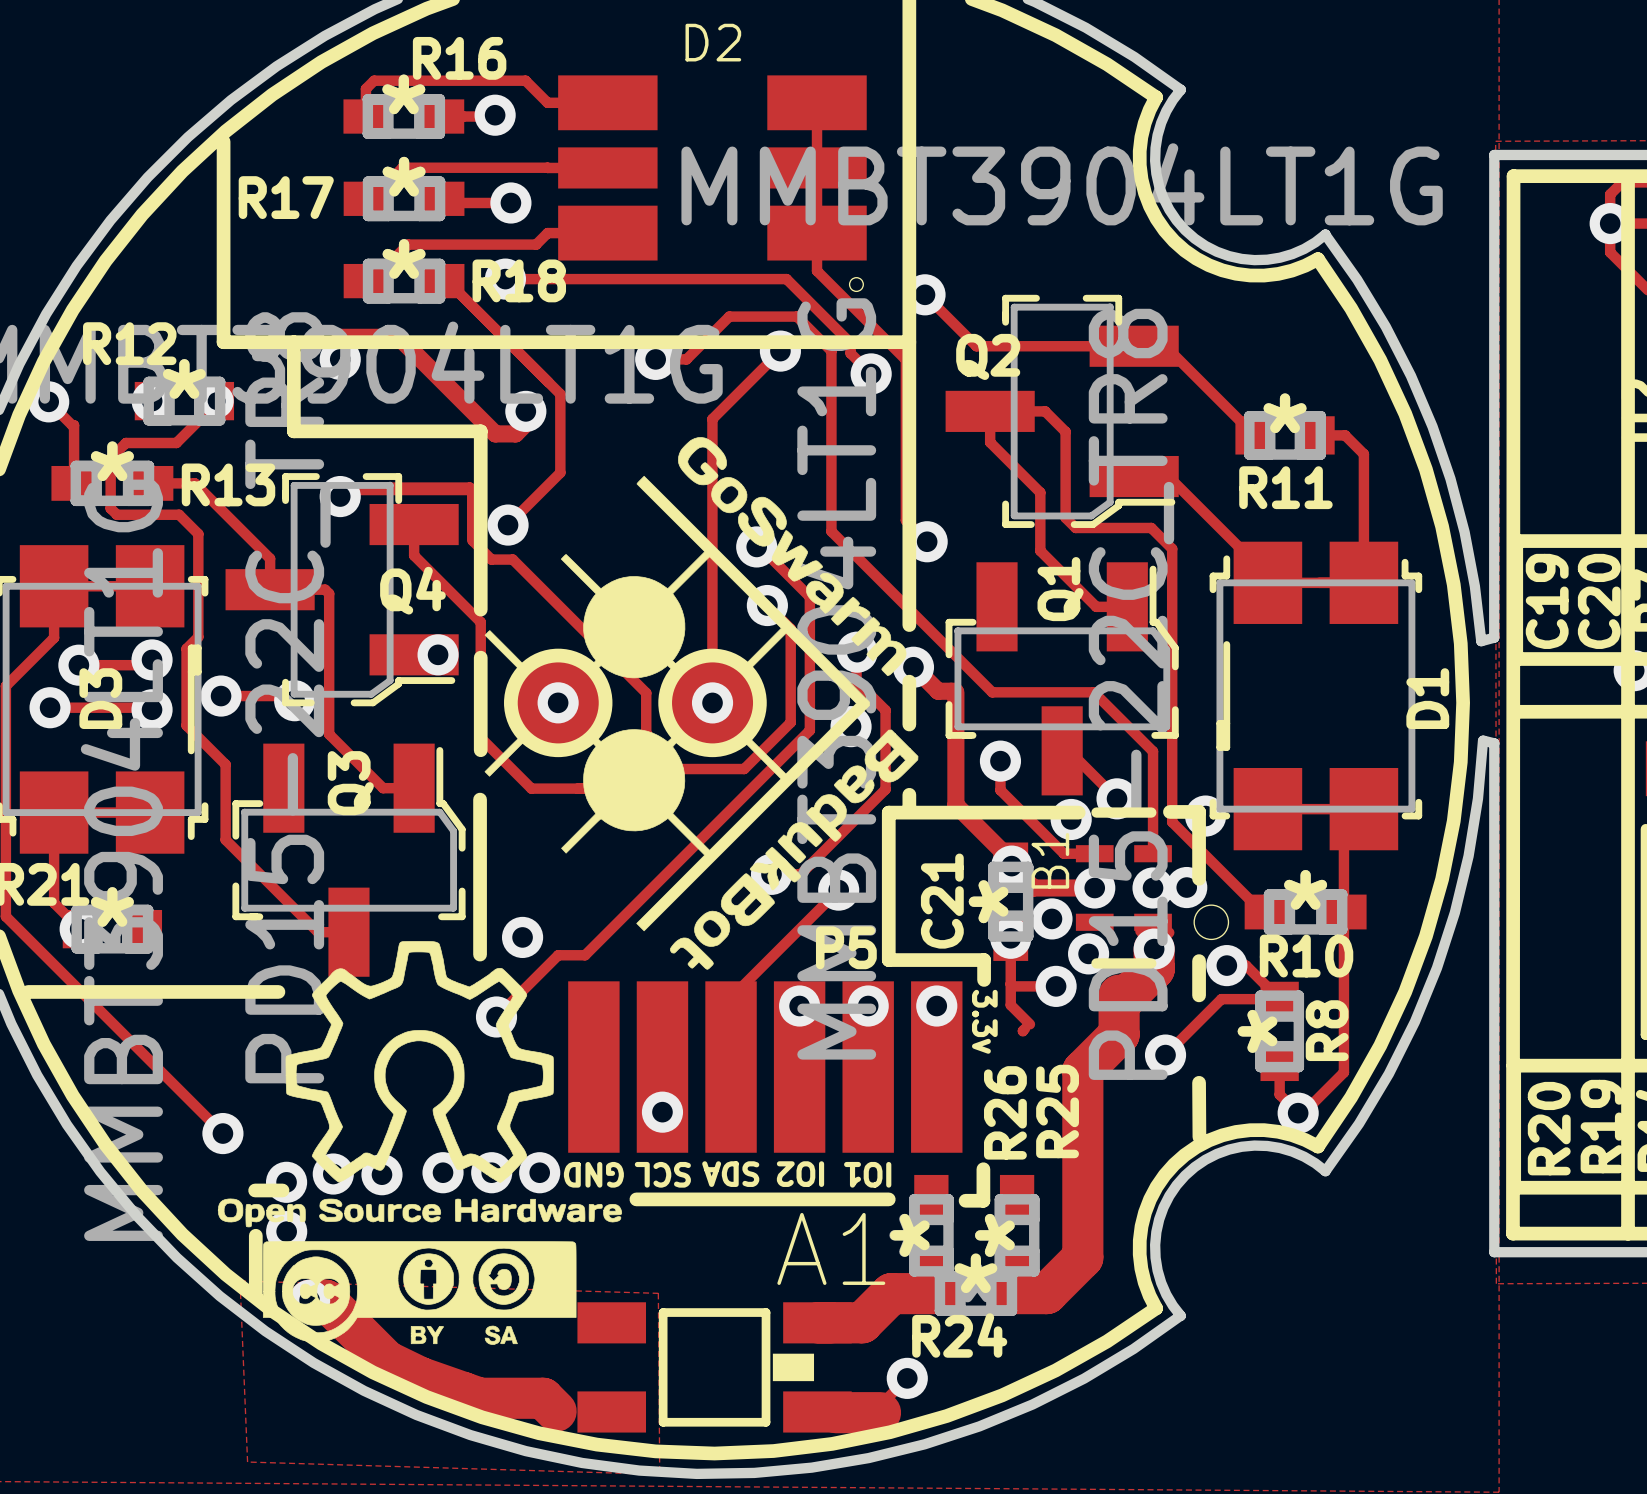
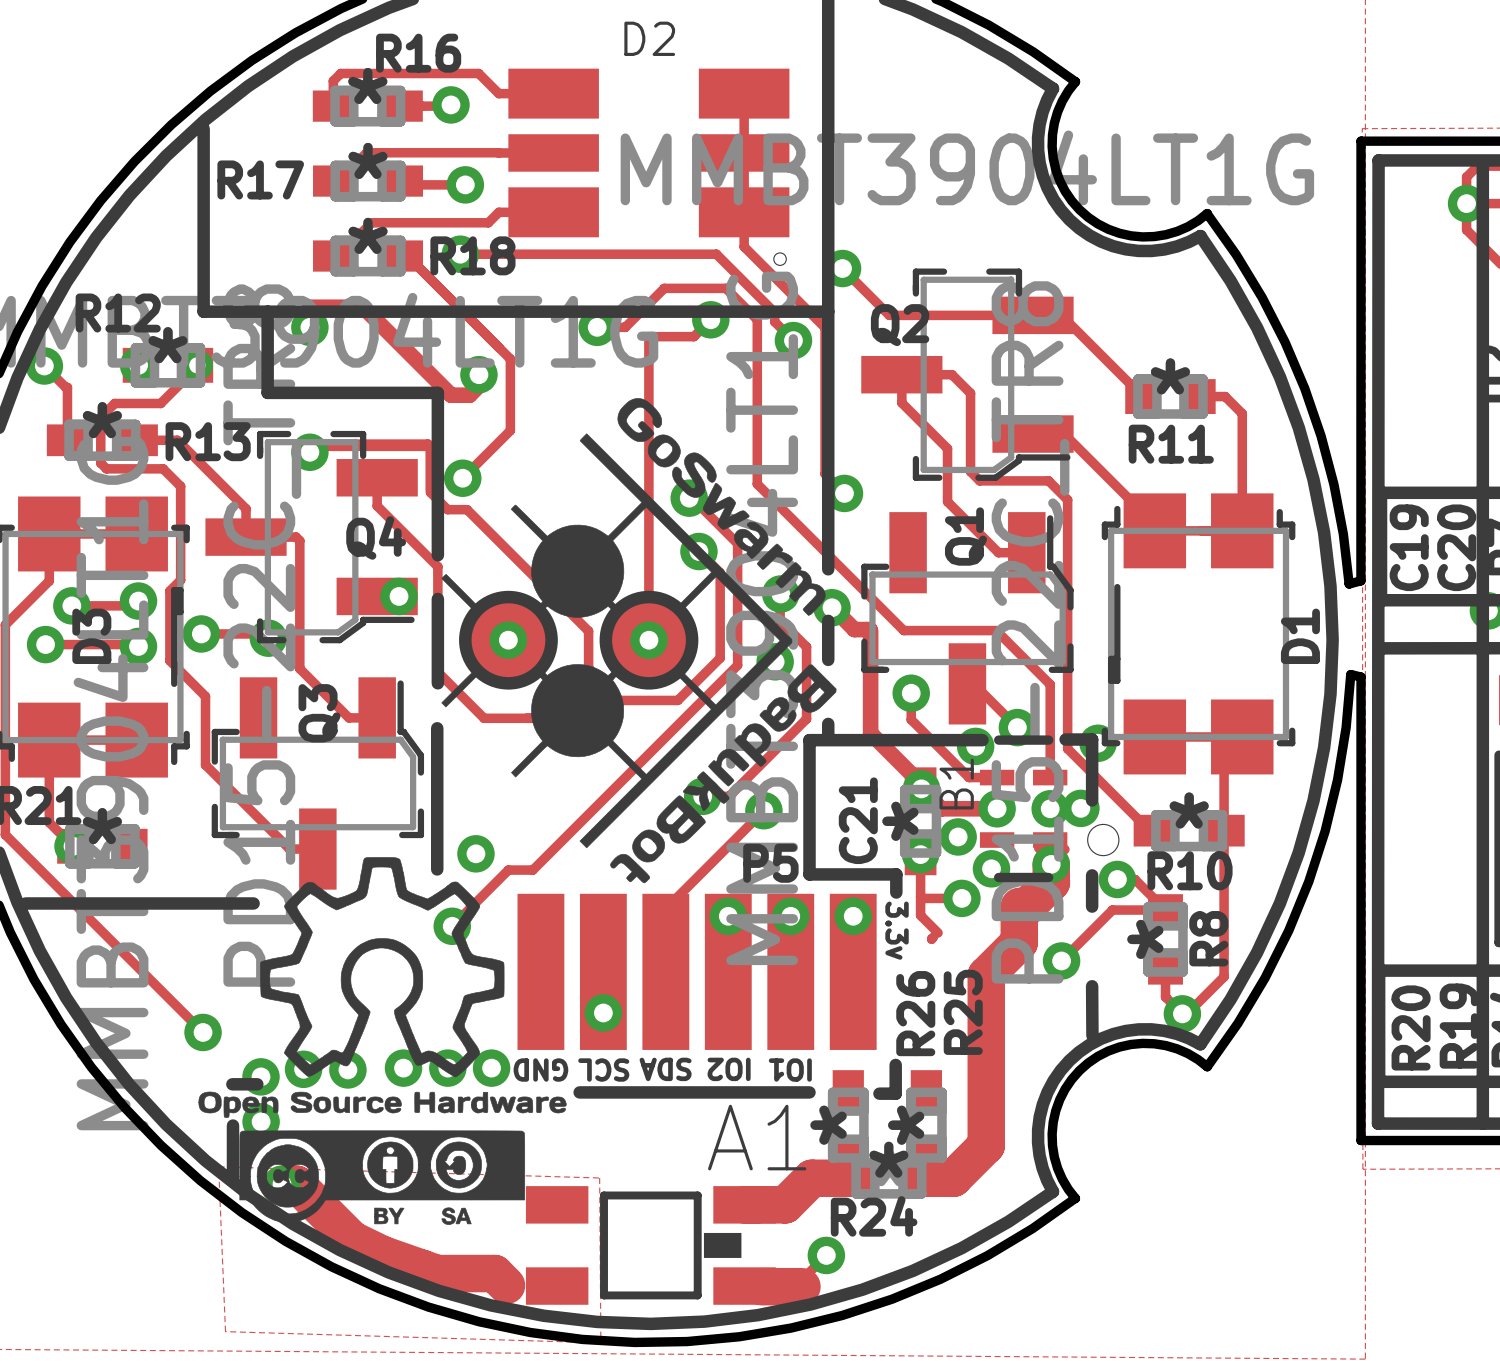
track: (761, 369) (712, 419) -> (693, 336) (648, 336) (648, 381)

